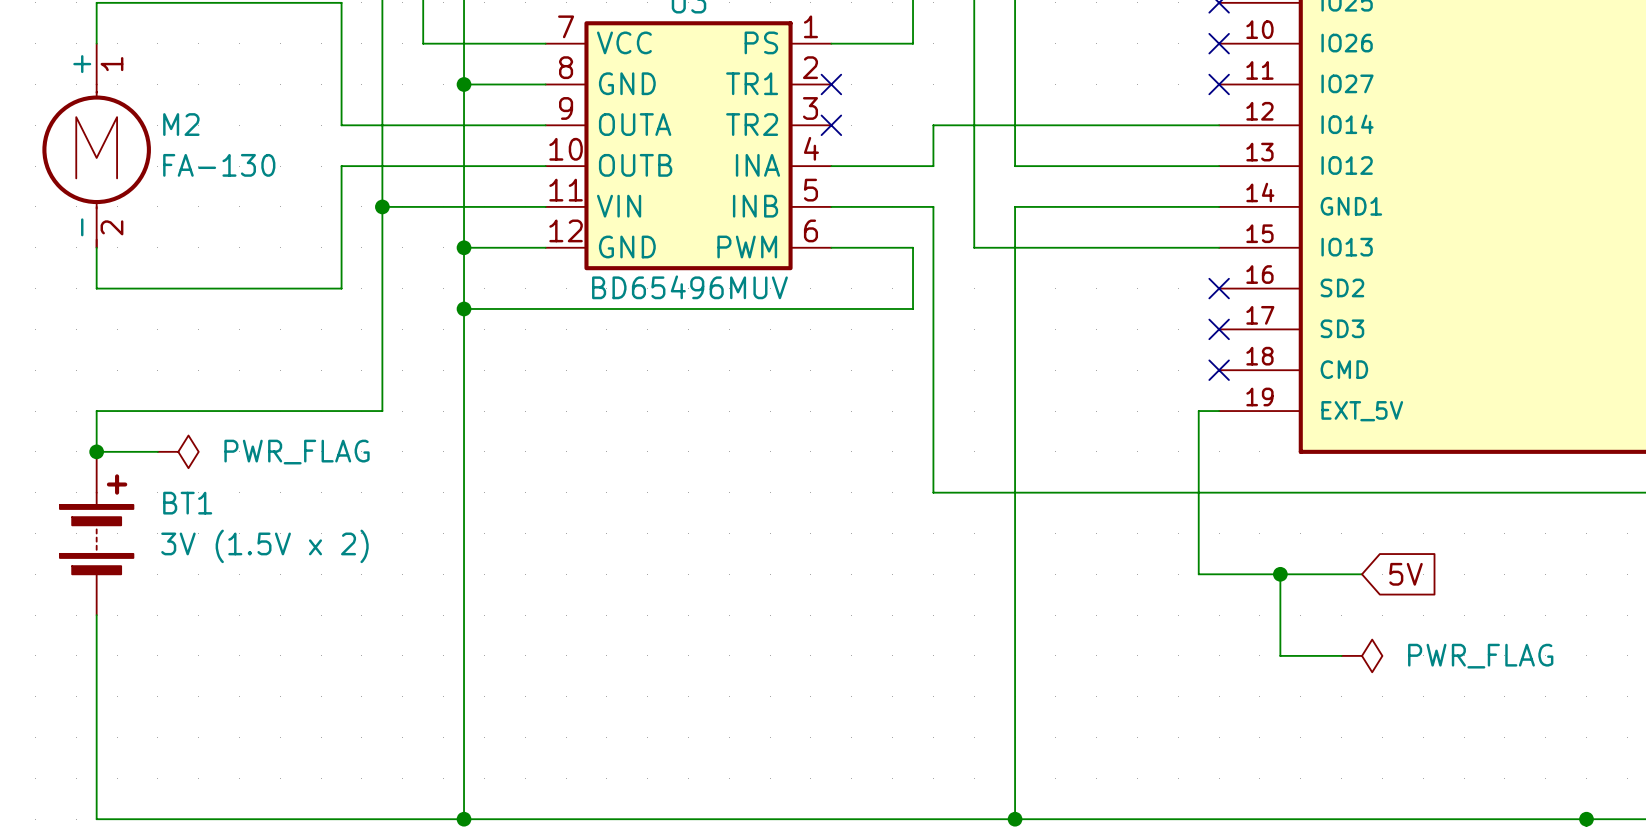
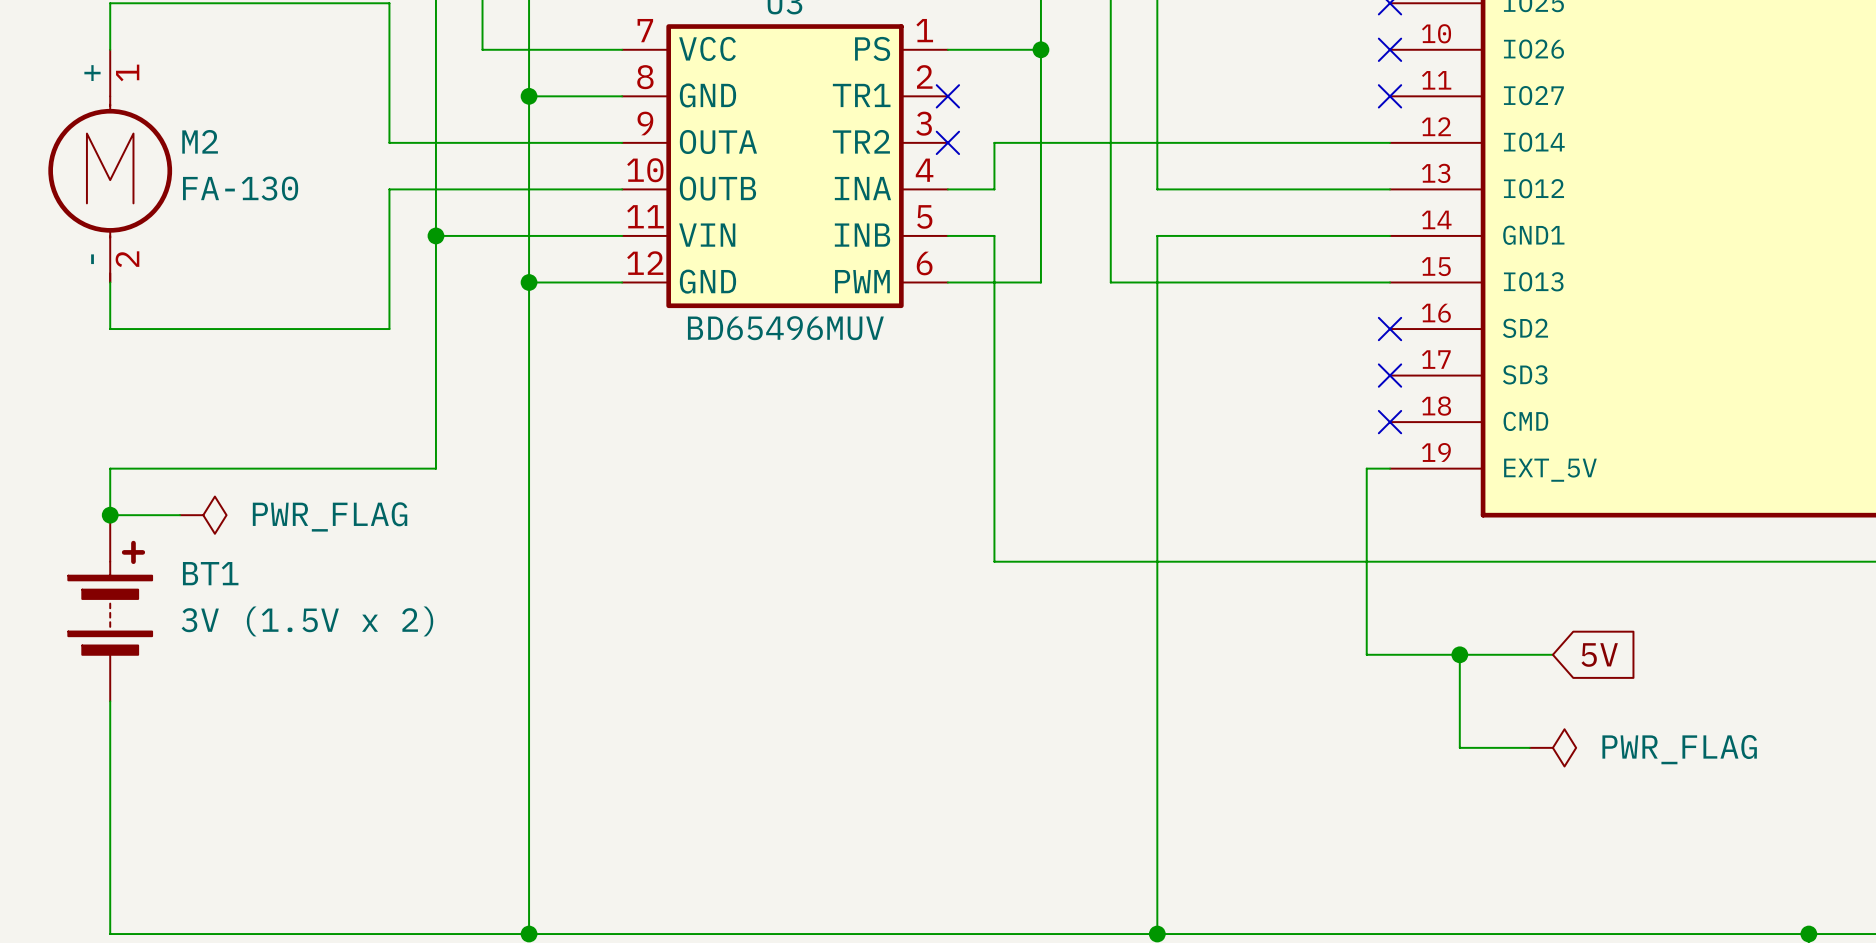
junction: none -> (1040, 49)
wire: (933, 125) (933, 166) (872, 166) -> (1064, 142) (994, 142) (994, 189)
wire: (872, 206) (933, 206) (933, 492) -> (994, 235) (994, 561) (1064, 561)
wire: (913, 247) (913, 308) (464, 308) -> (1040, 282) (1040, 49)
junction: (464, 308) -> none

